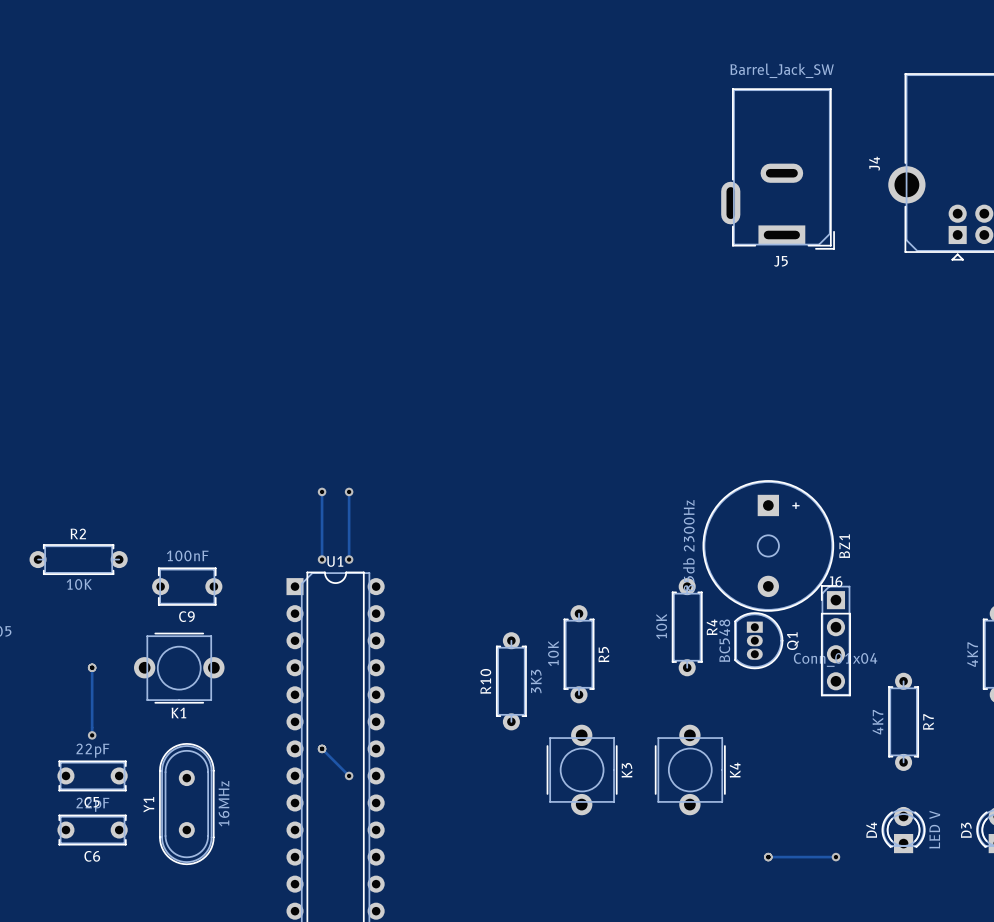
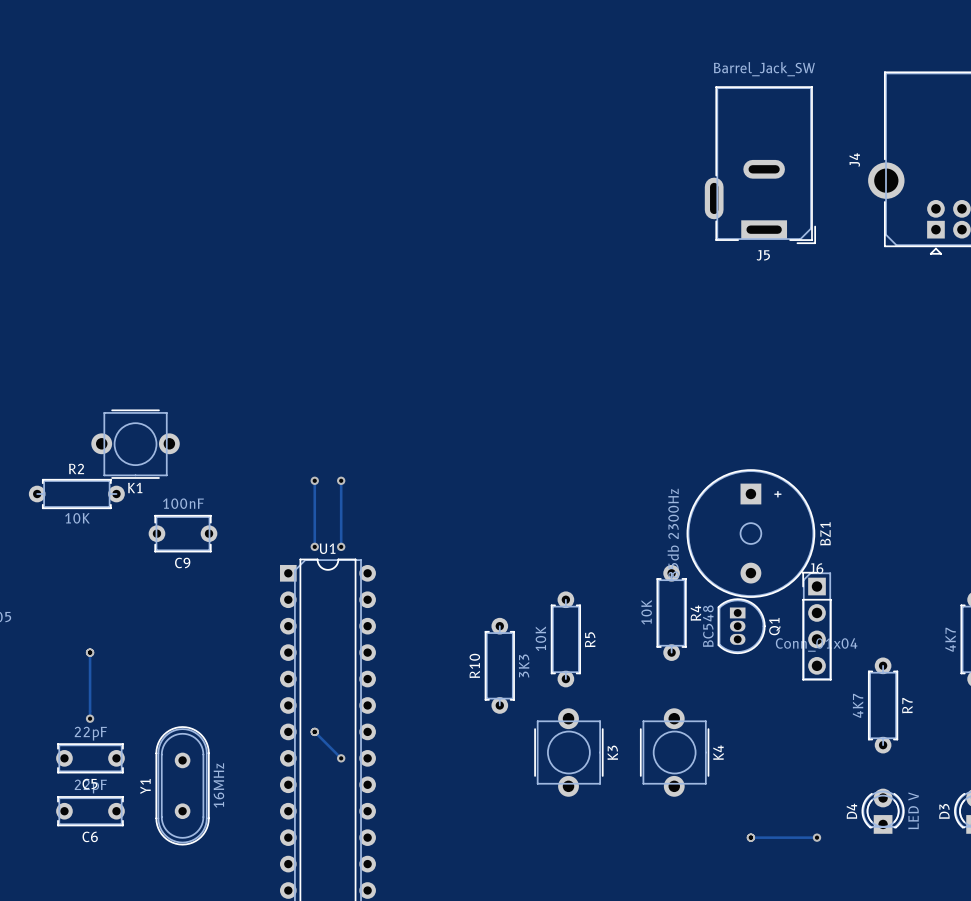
R2 position: (78, 559) -> (76, 494)
C9 position: (187, 586) -> (183, 533)
K1 position: (179, 668) -> (135, 444)

